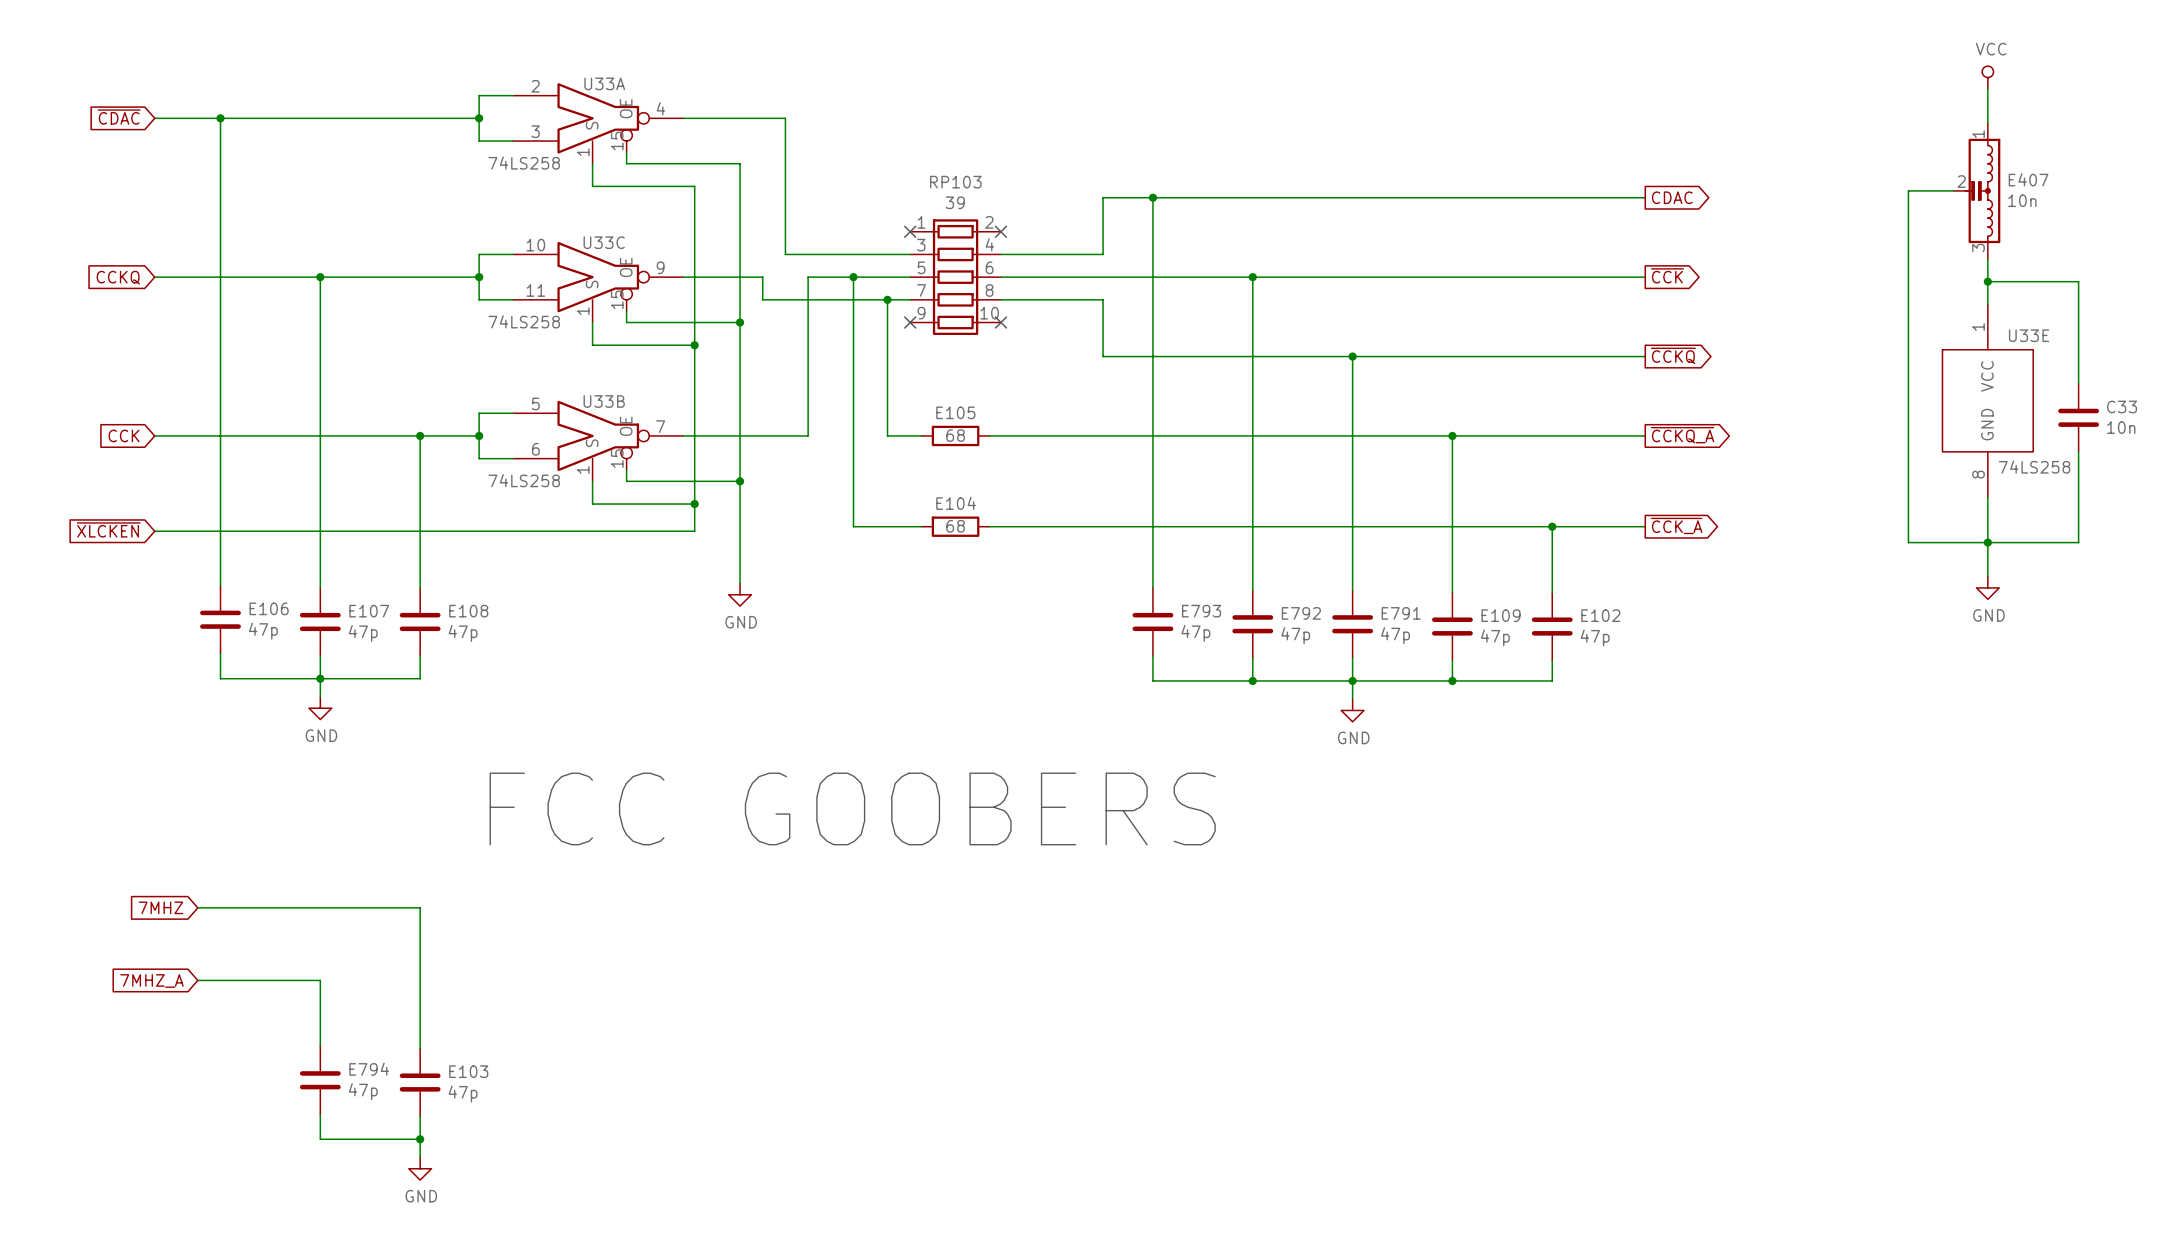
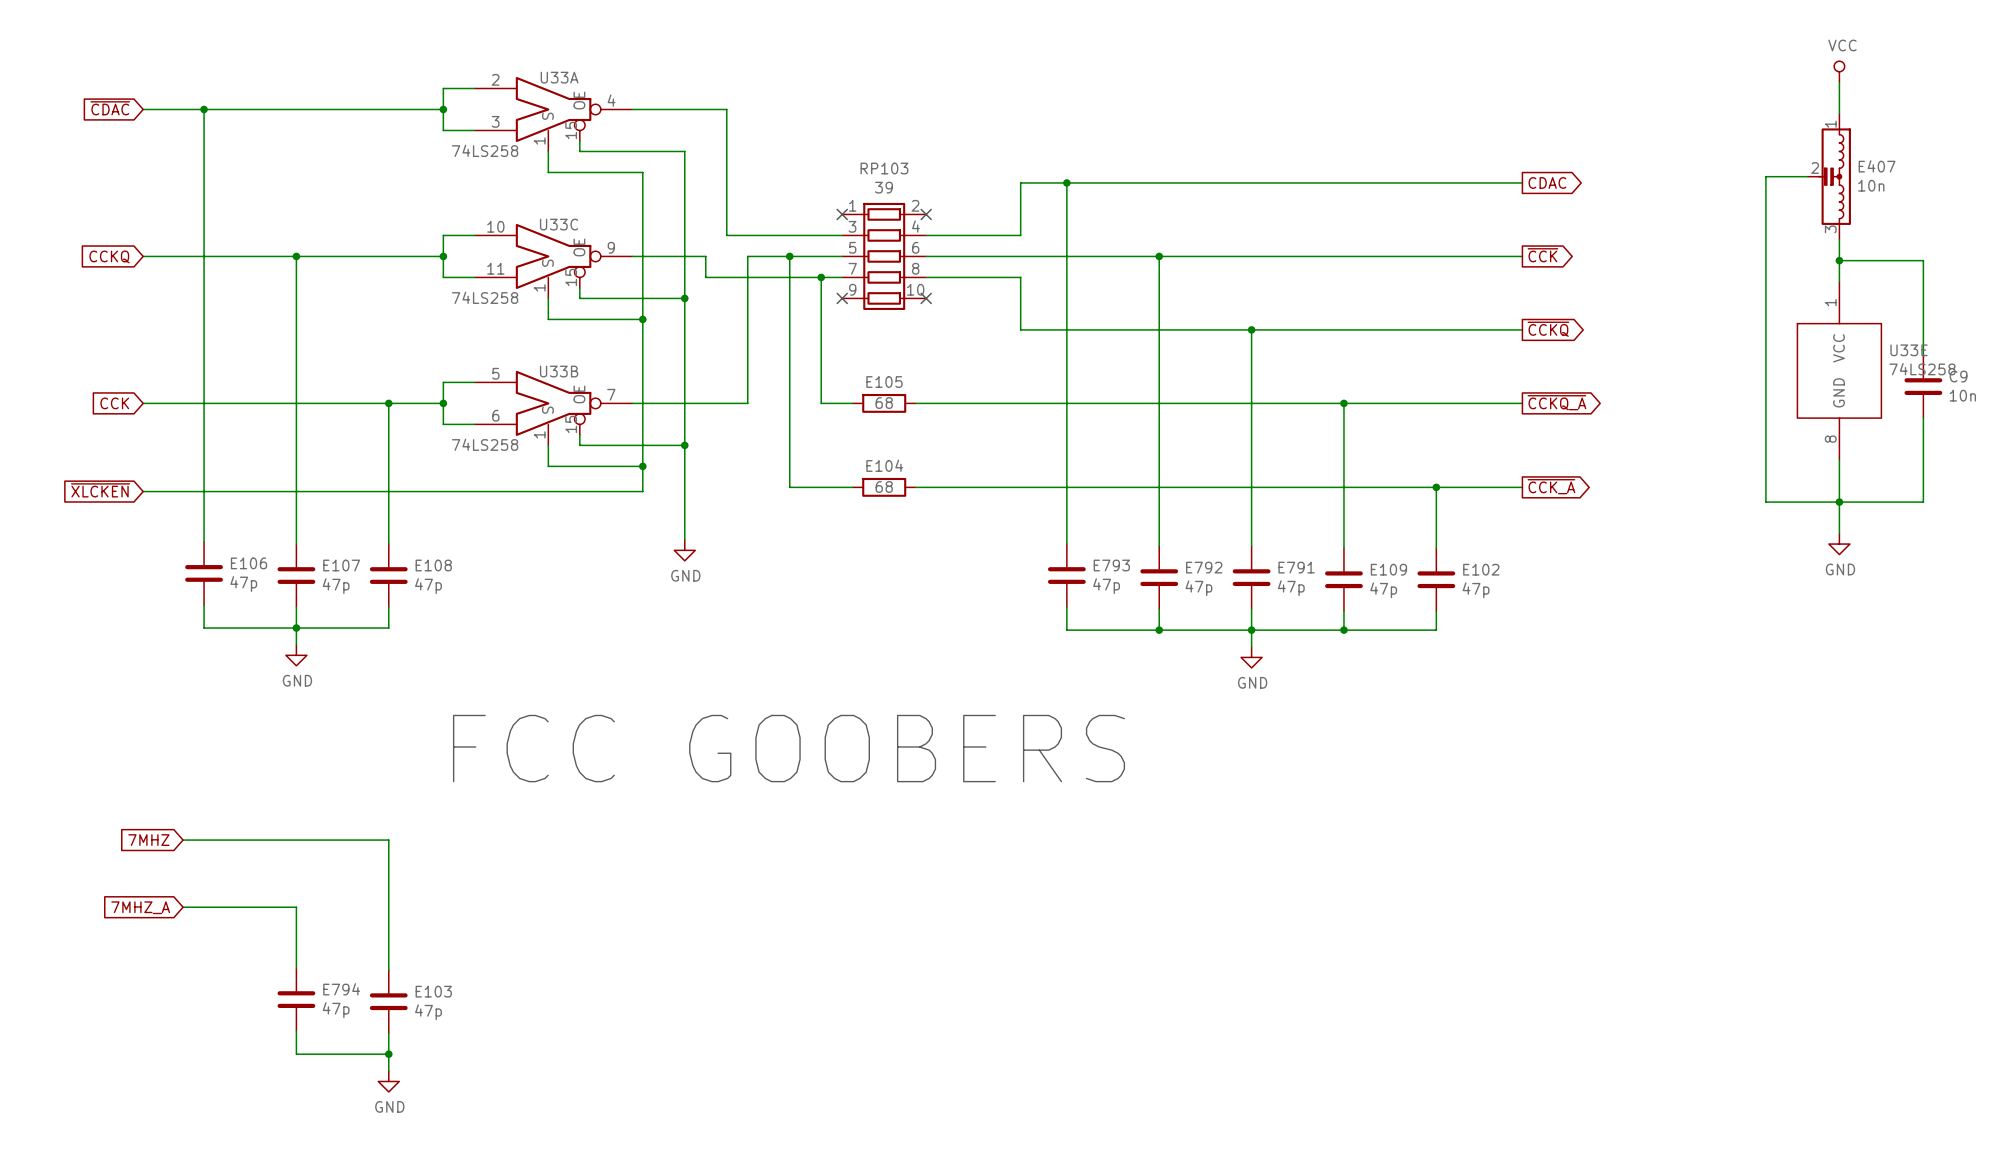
U33E name position: U33E (2029, 335) -> U33E (1909, 350)
C33 name: C33 (2122, 406) -> C9 (1958, 376)
U33E value position: 74LS258 (2034, 467) -> 74LS258 (1922, 369)

